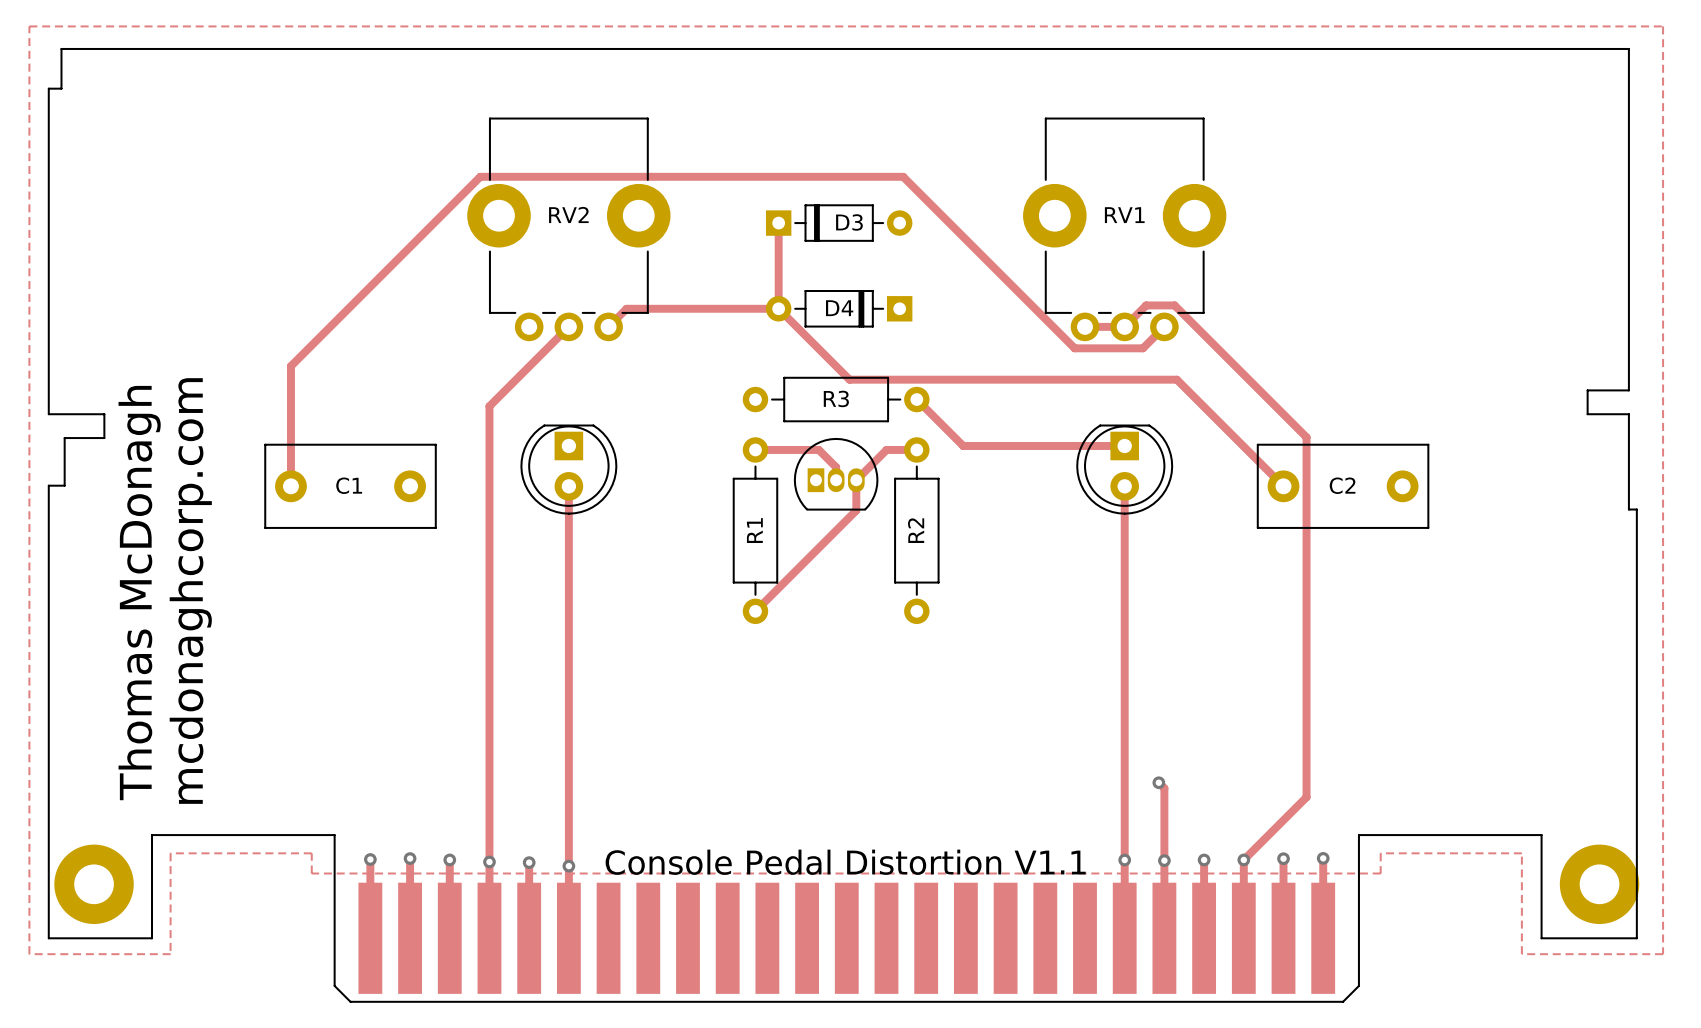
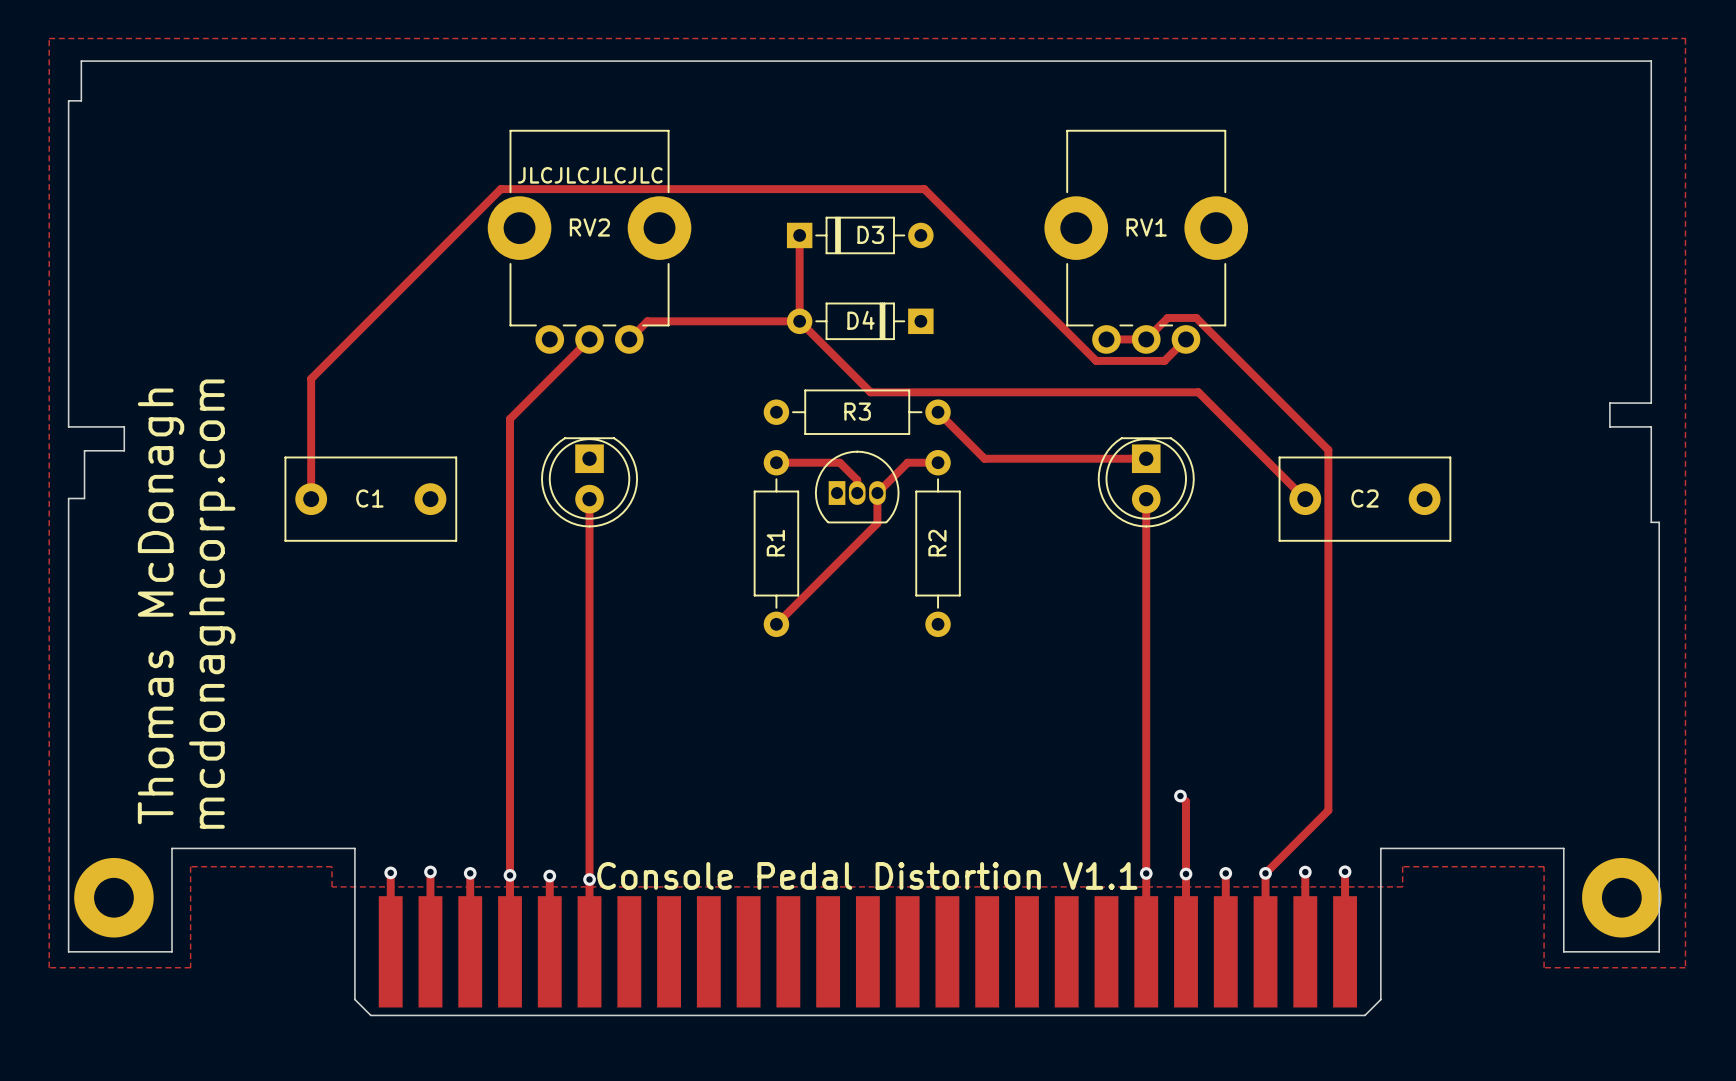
text: none -> JLCJLCJLCJLC (590, 175)

